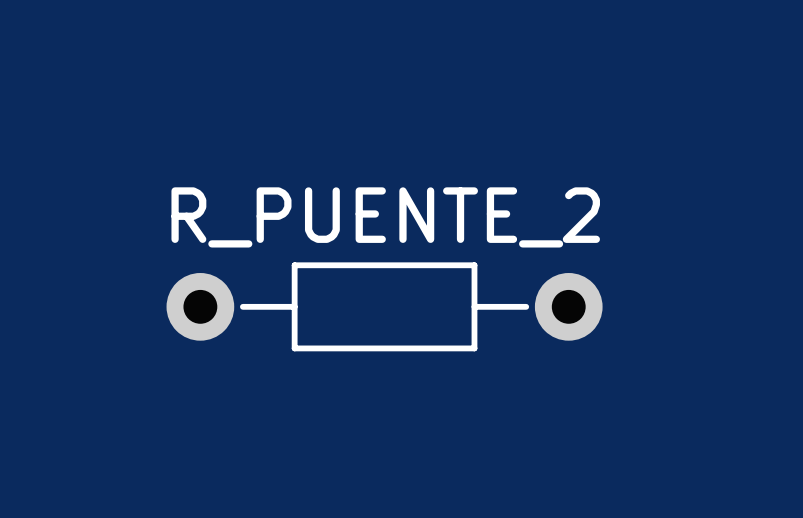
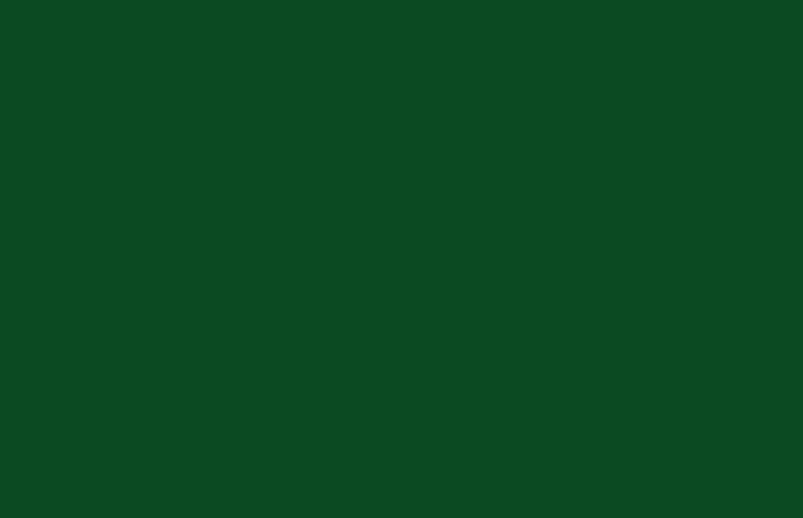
R_PUENTE_2: (384, 306) -> none

